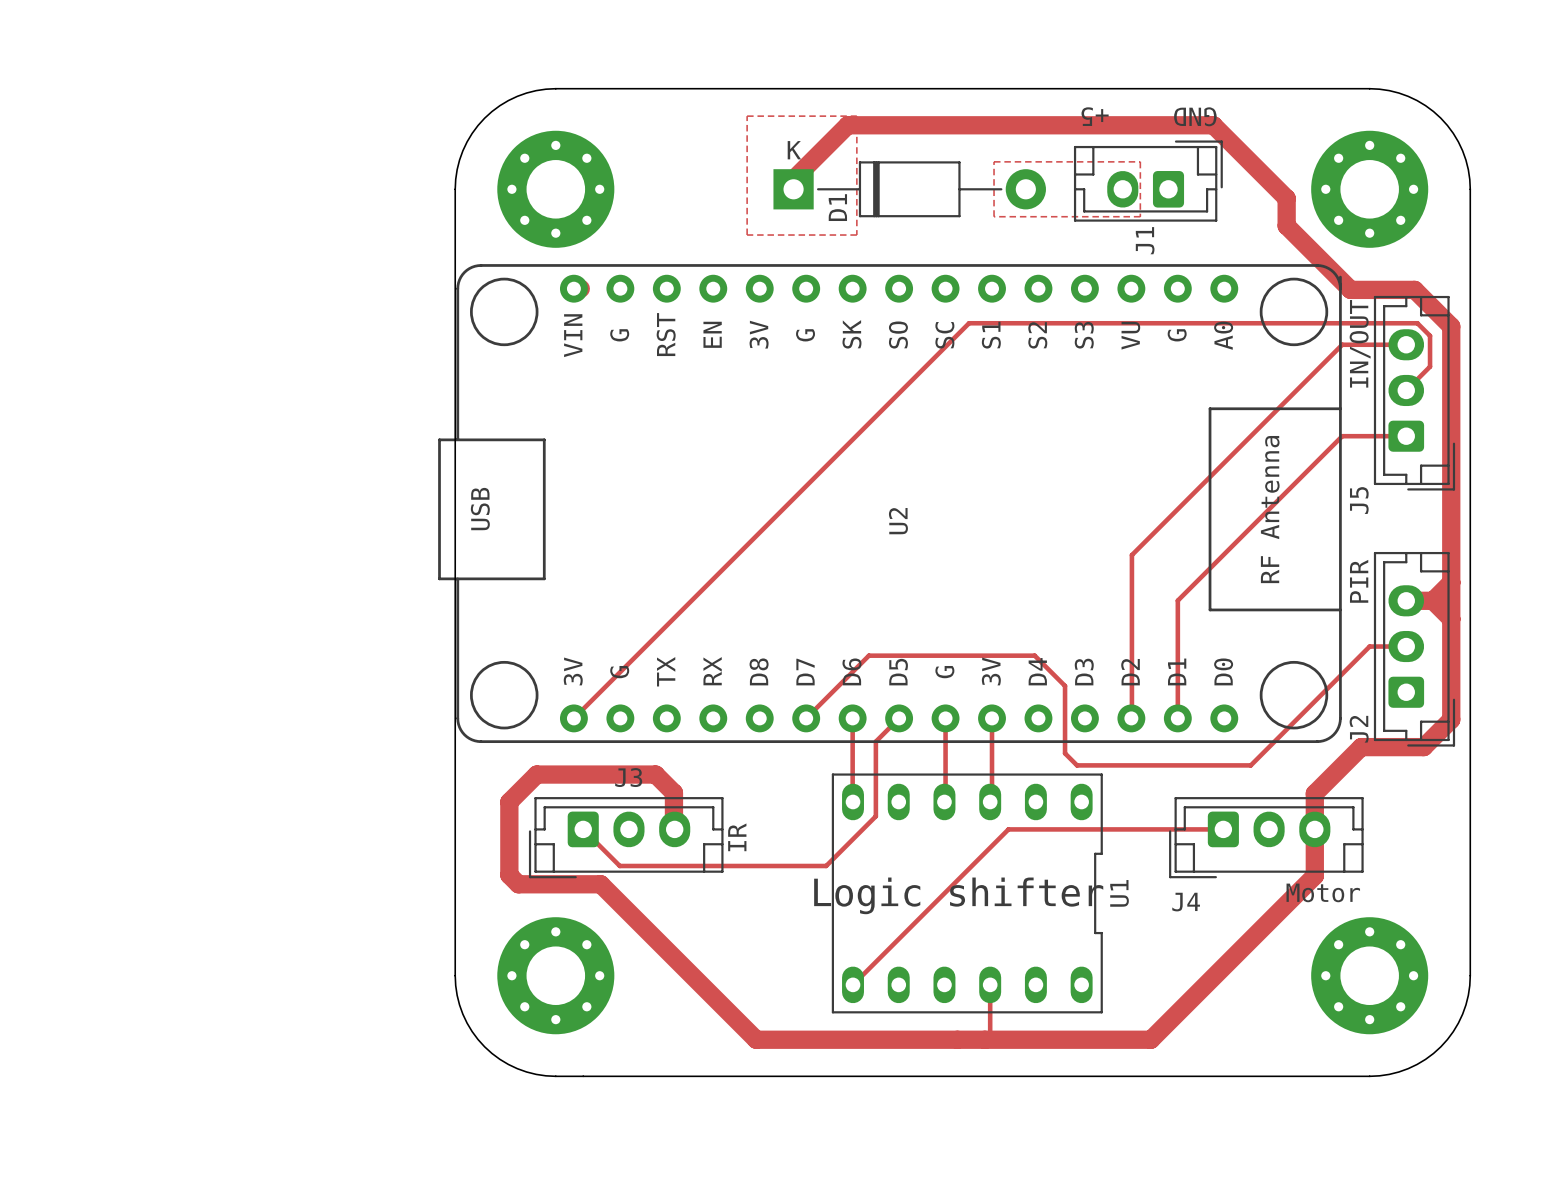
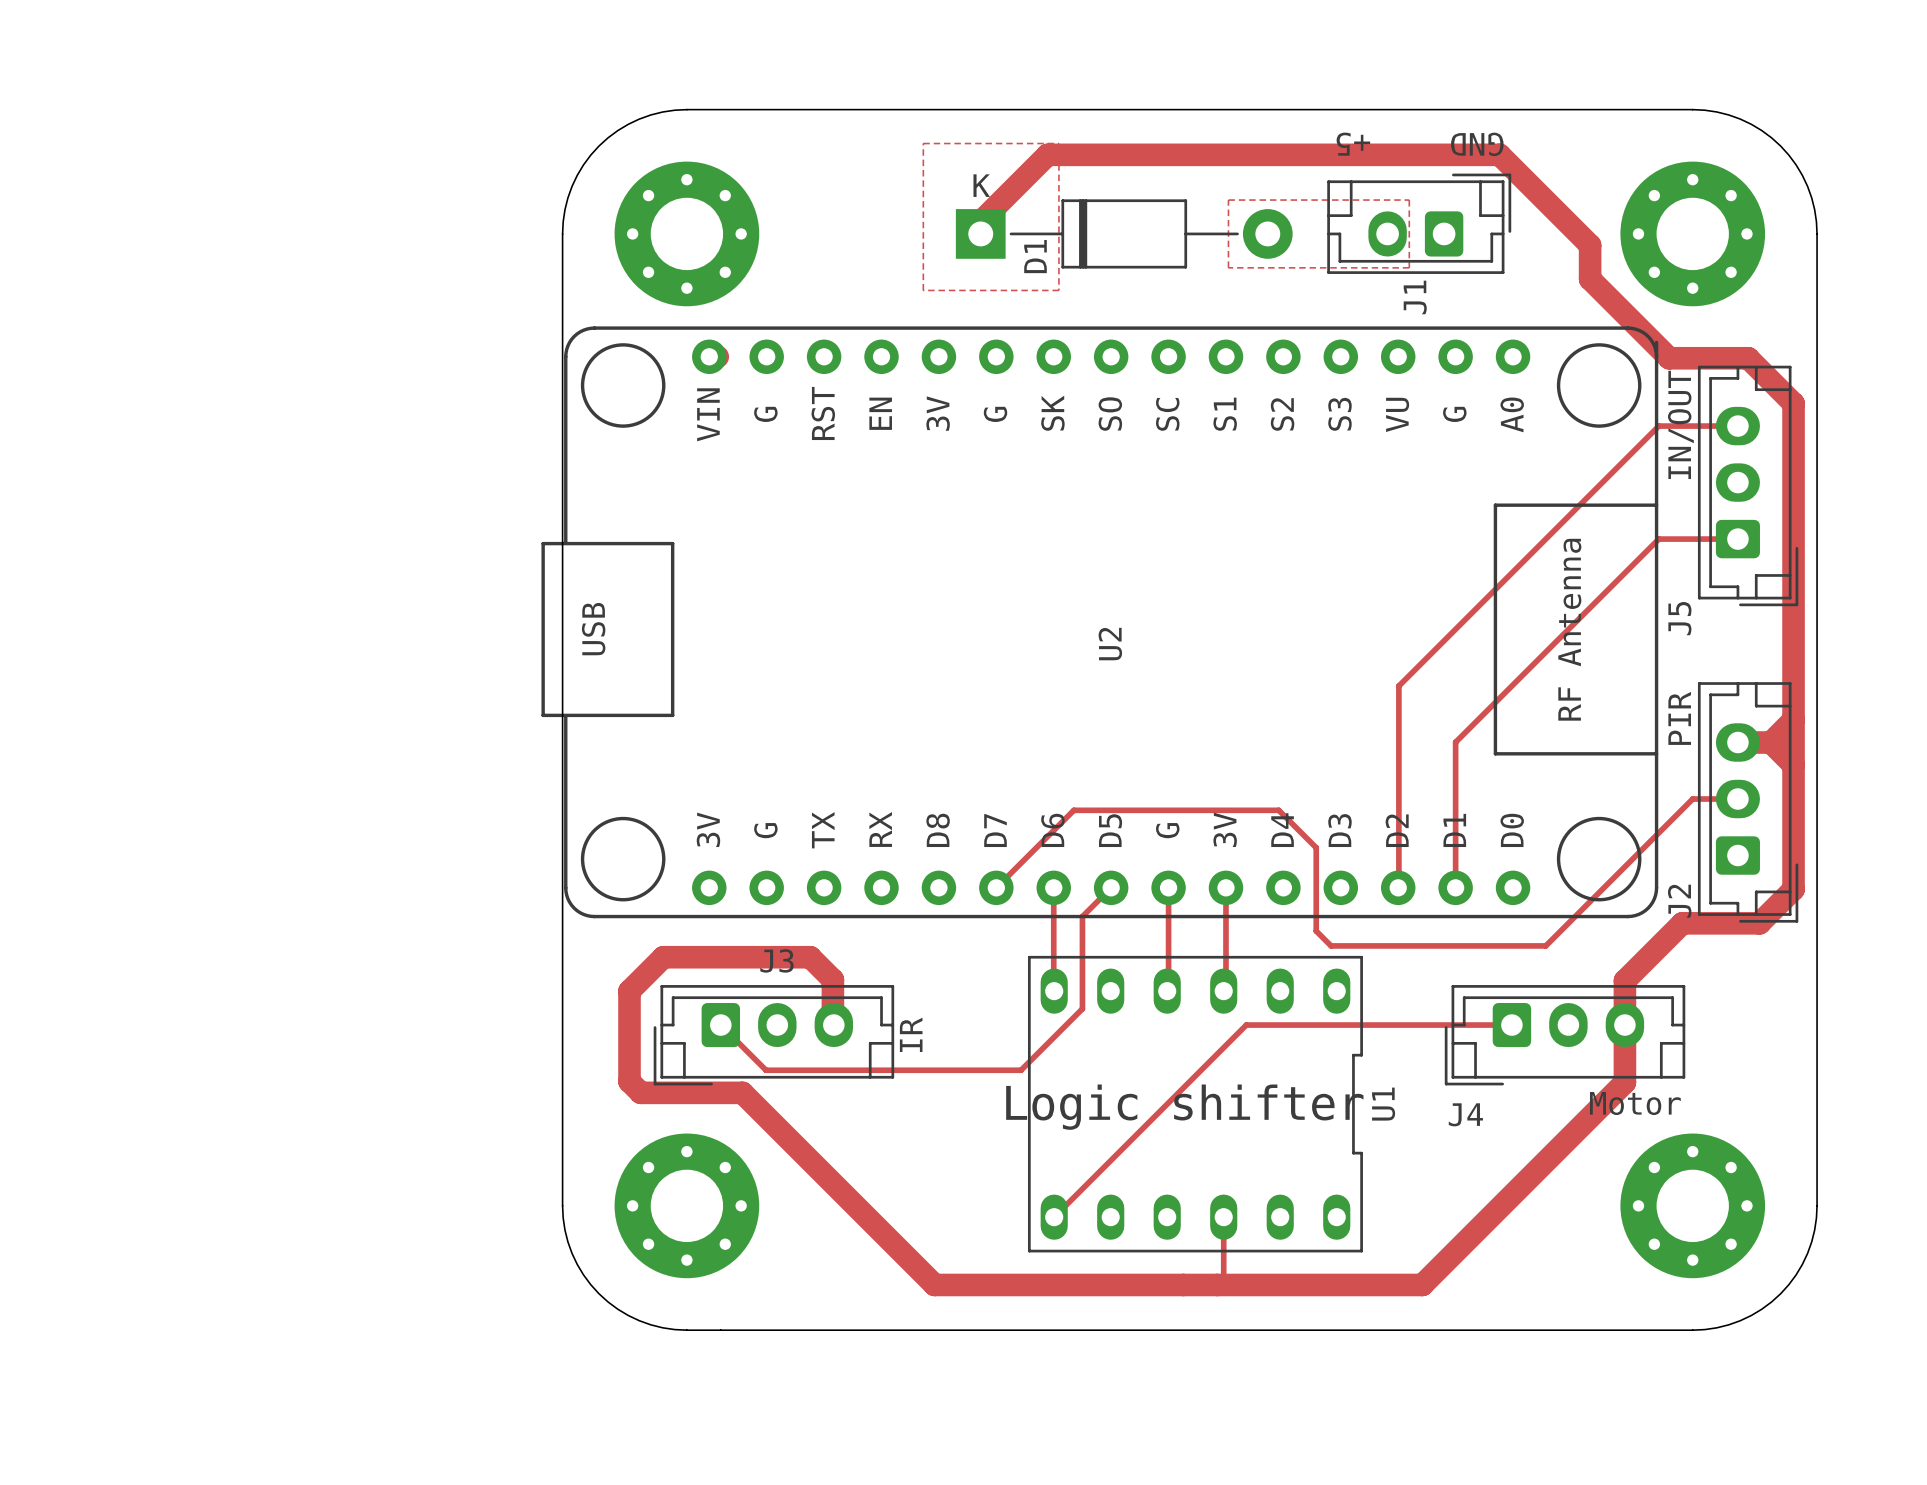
track: (1406, 390) (1430, 366) (1430, 335) (1417, 323) (969, 323) (573, 718) -> none

